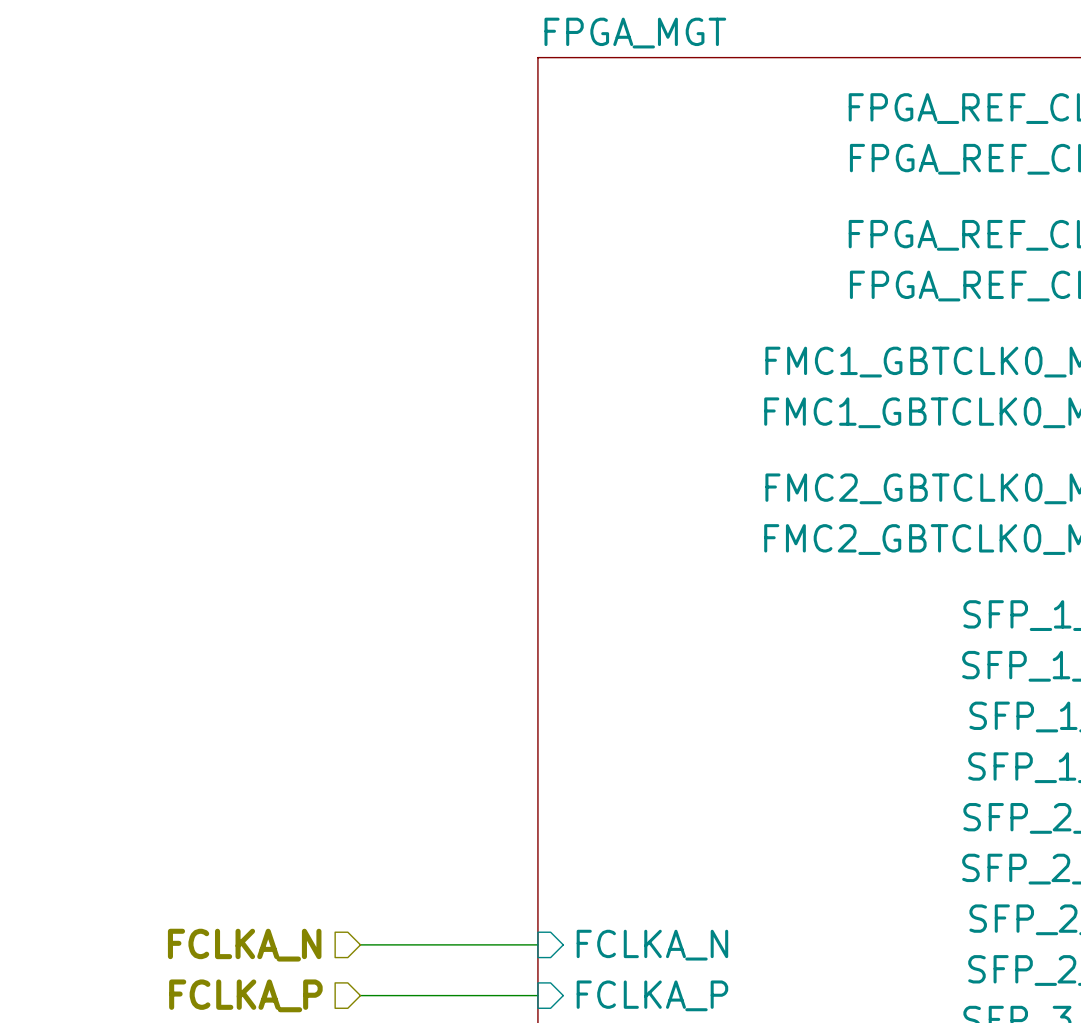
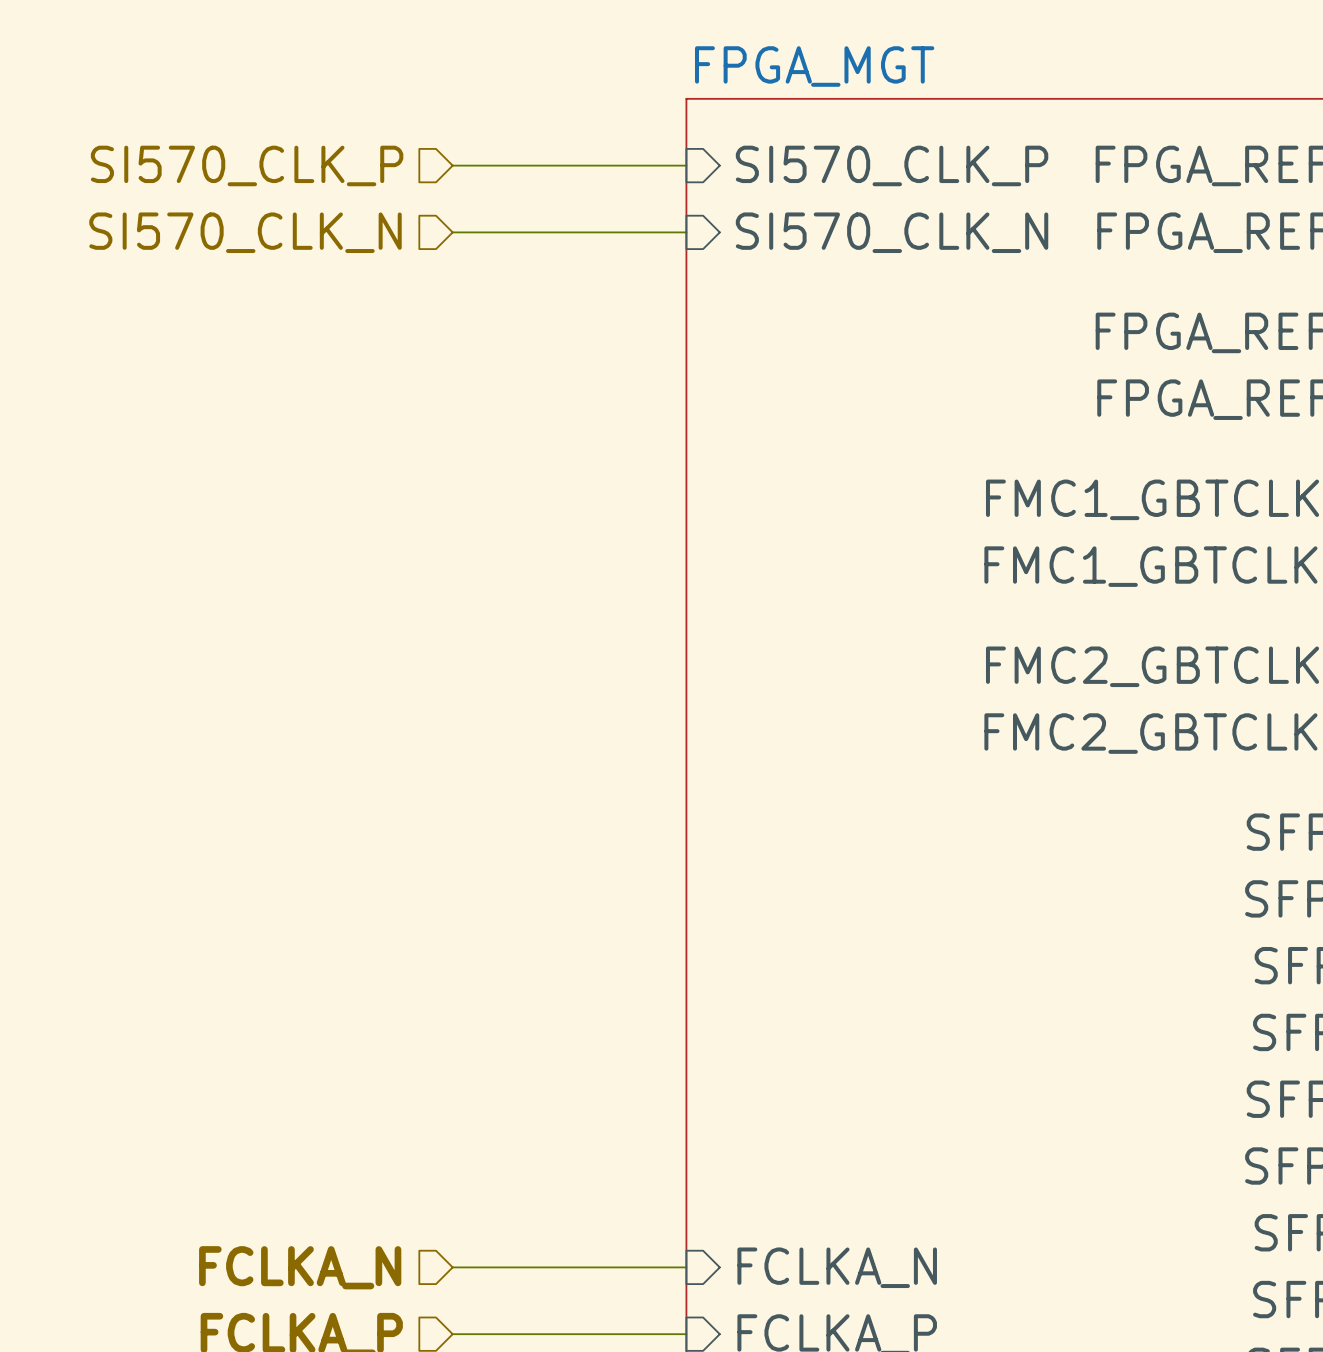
hierarchical label: none -> SI570_CLK_P (247, 165)
wire: none -> (452, 165) (686, 165)
sheet pin: none -> SI570_CLK_P (892, 165)
hierarchical label: none -> SI570_CLK_N (245, 232)
wire: none -> (452, 232) (686, 232)
sheet pin: none -> SI570_CLK_N (892, 232)

